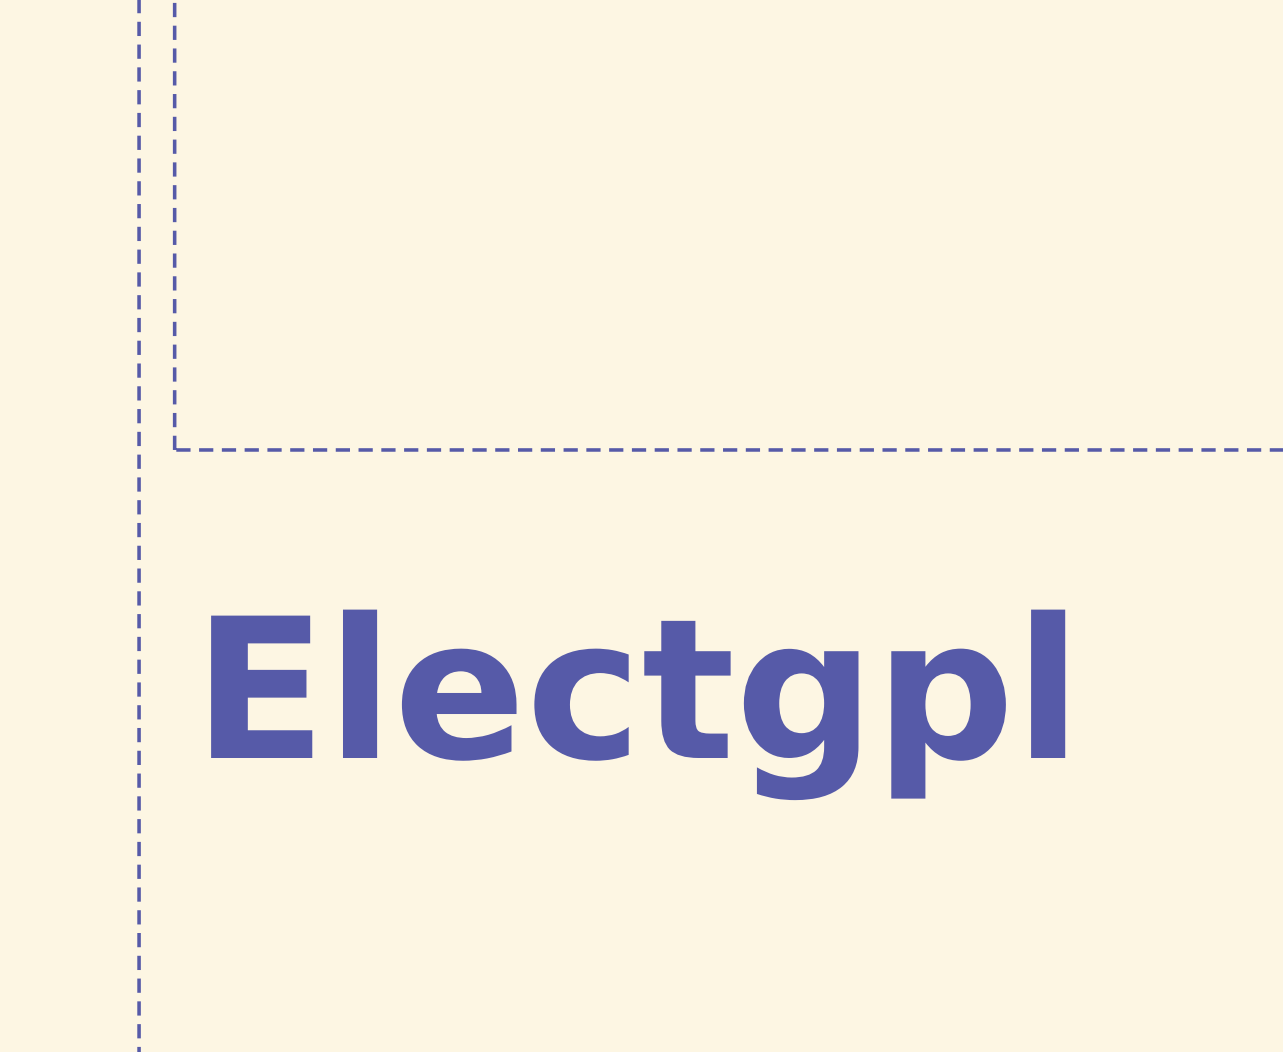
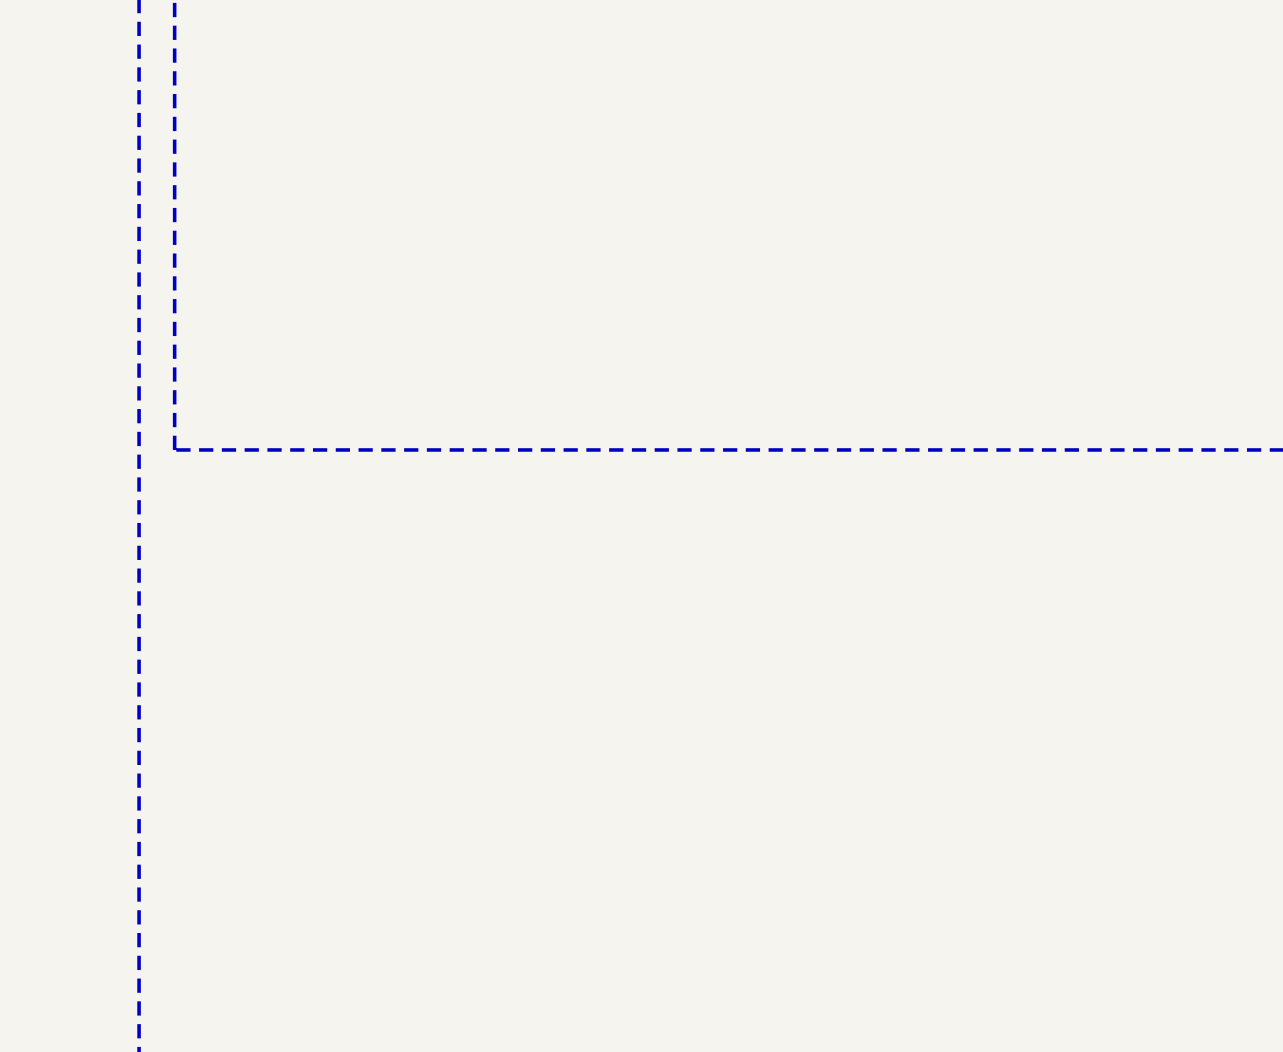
text: Electgpl (638, 704) -> none

